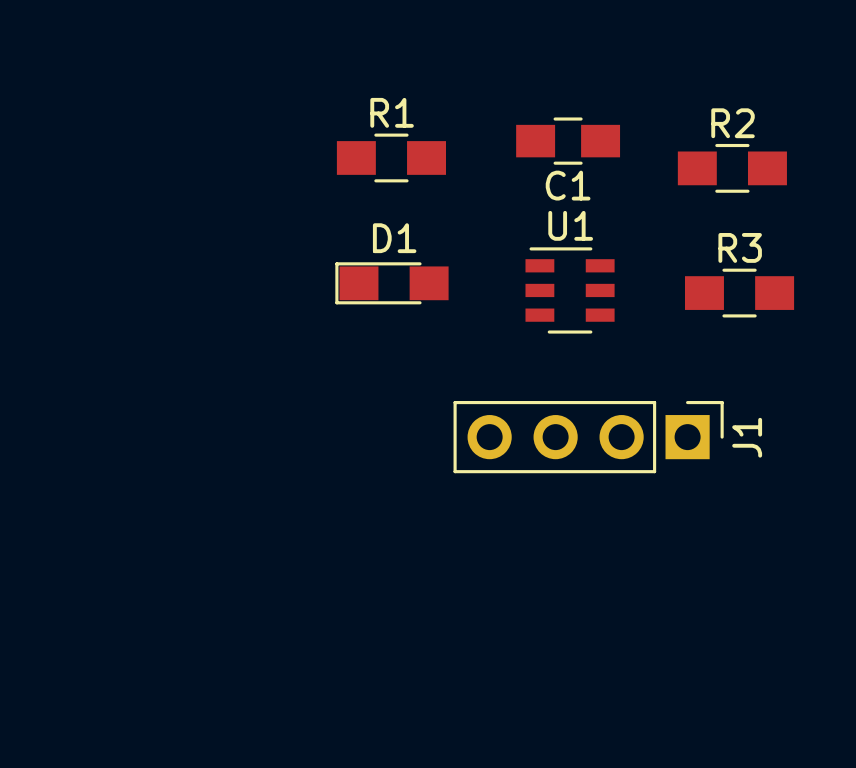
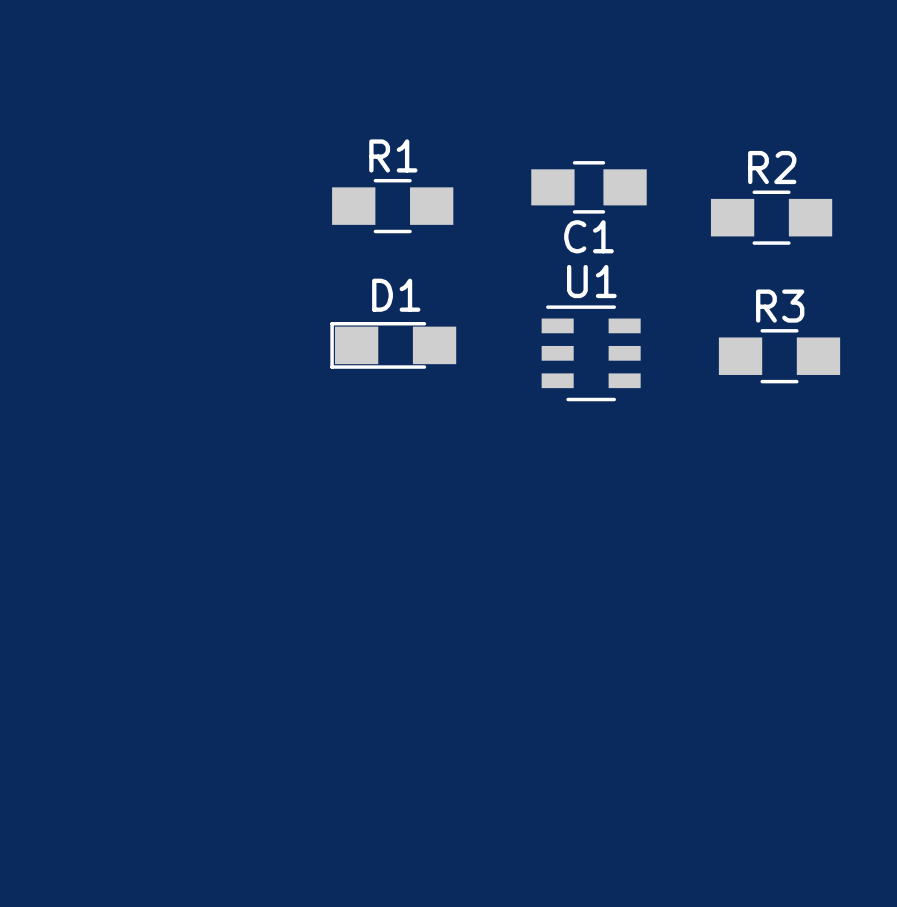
J1: (588, 437) -> none

